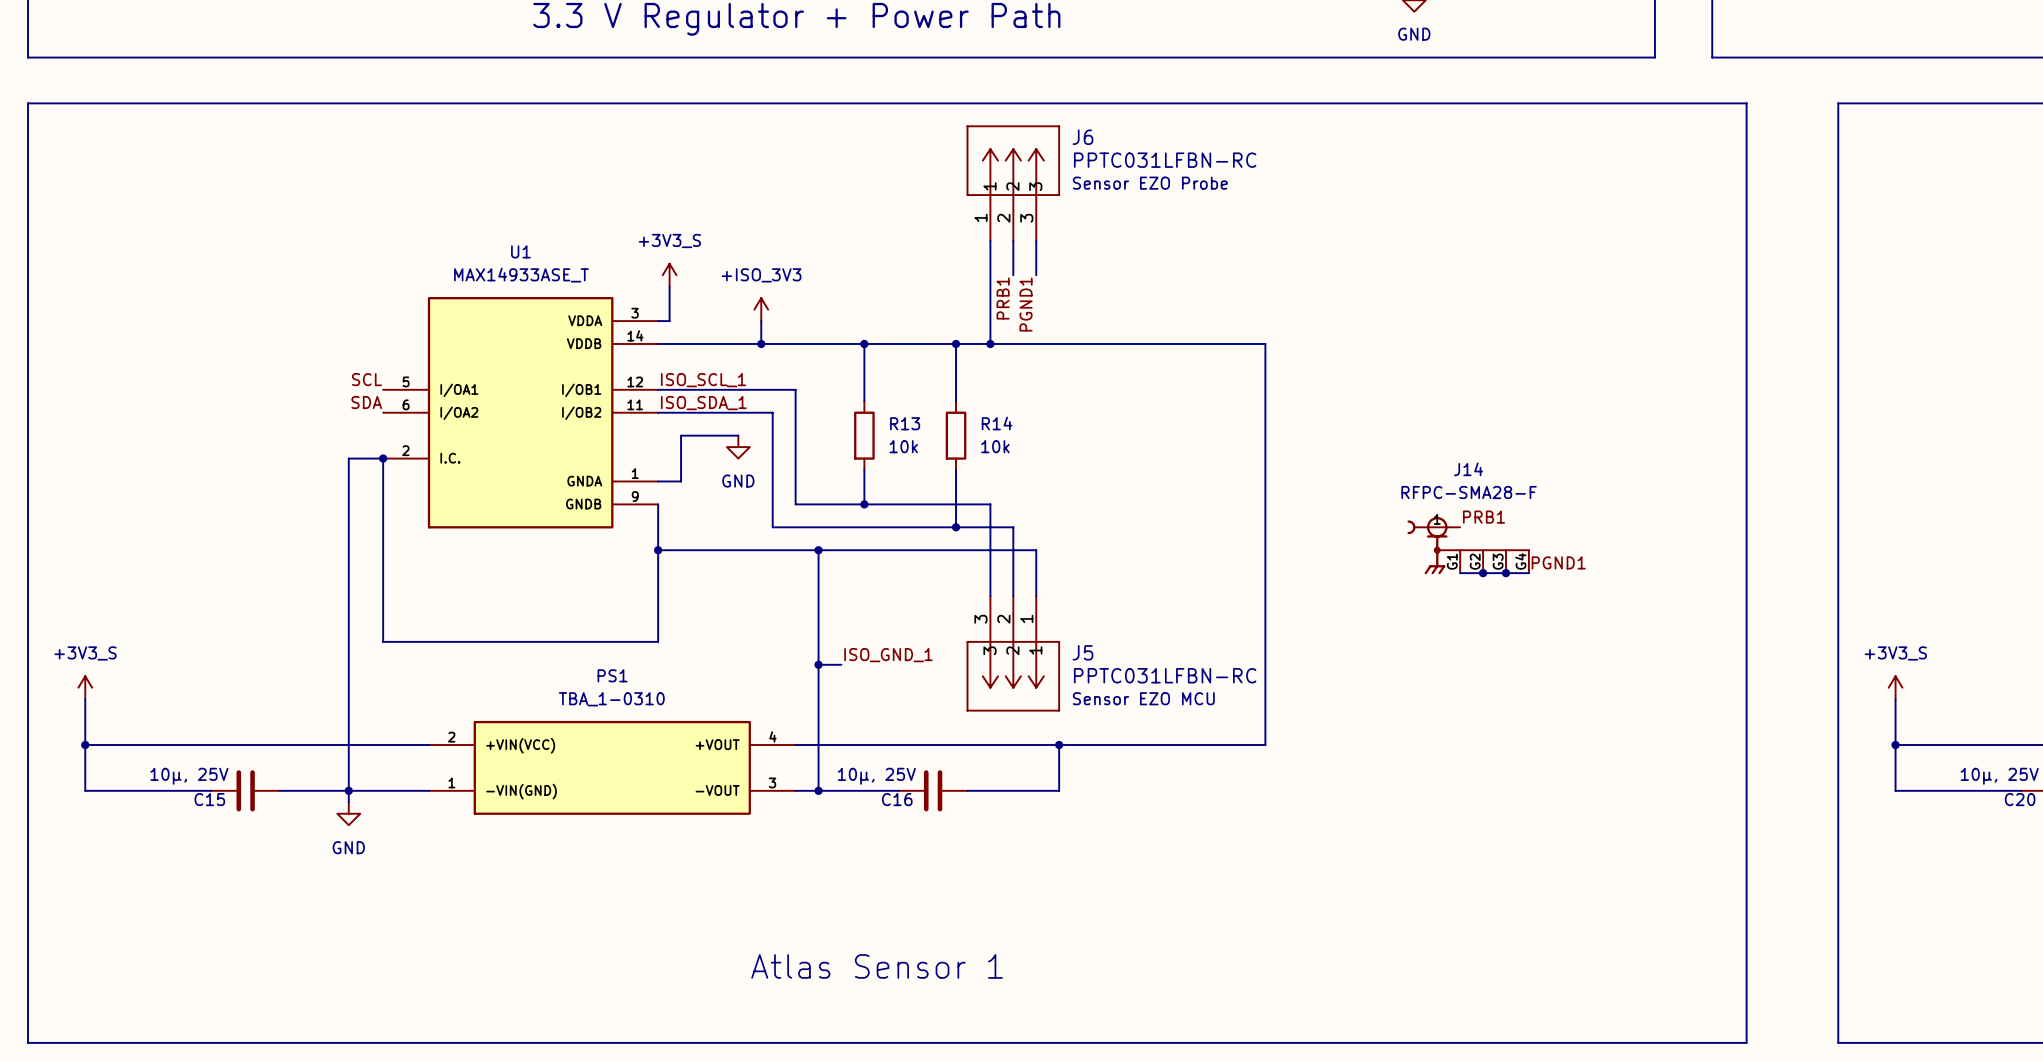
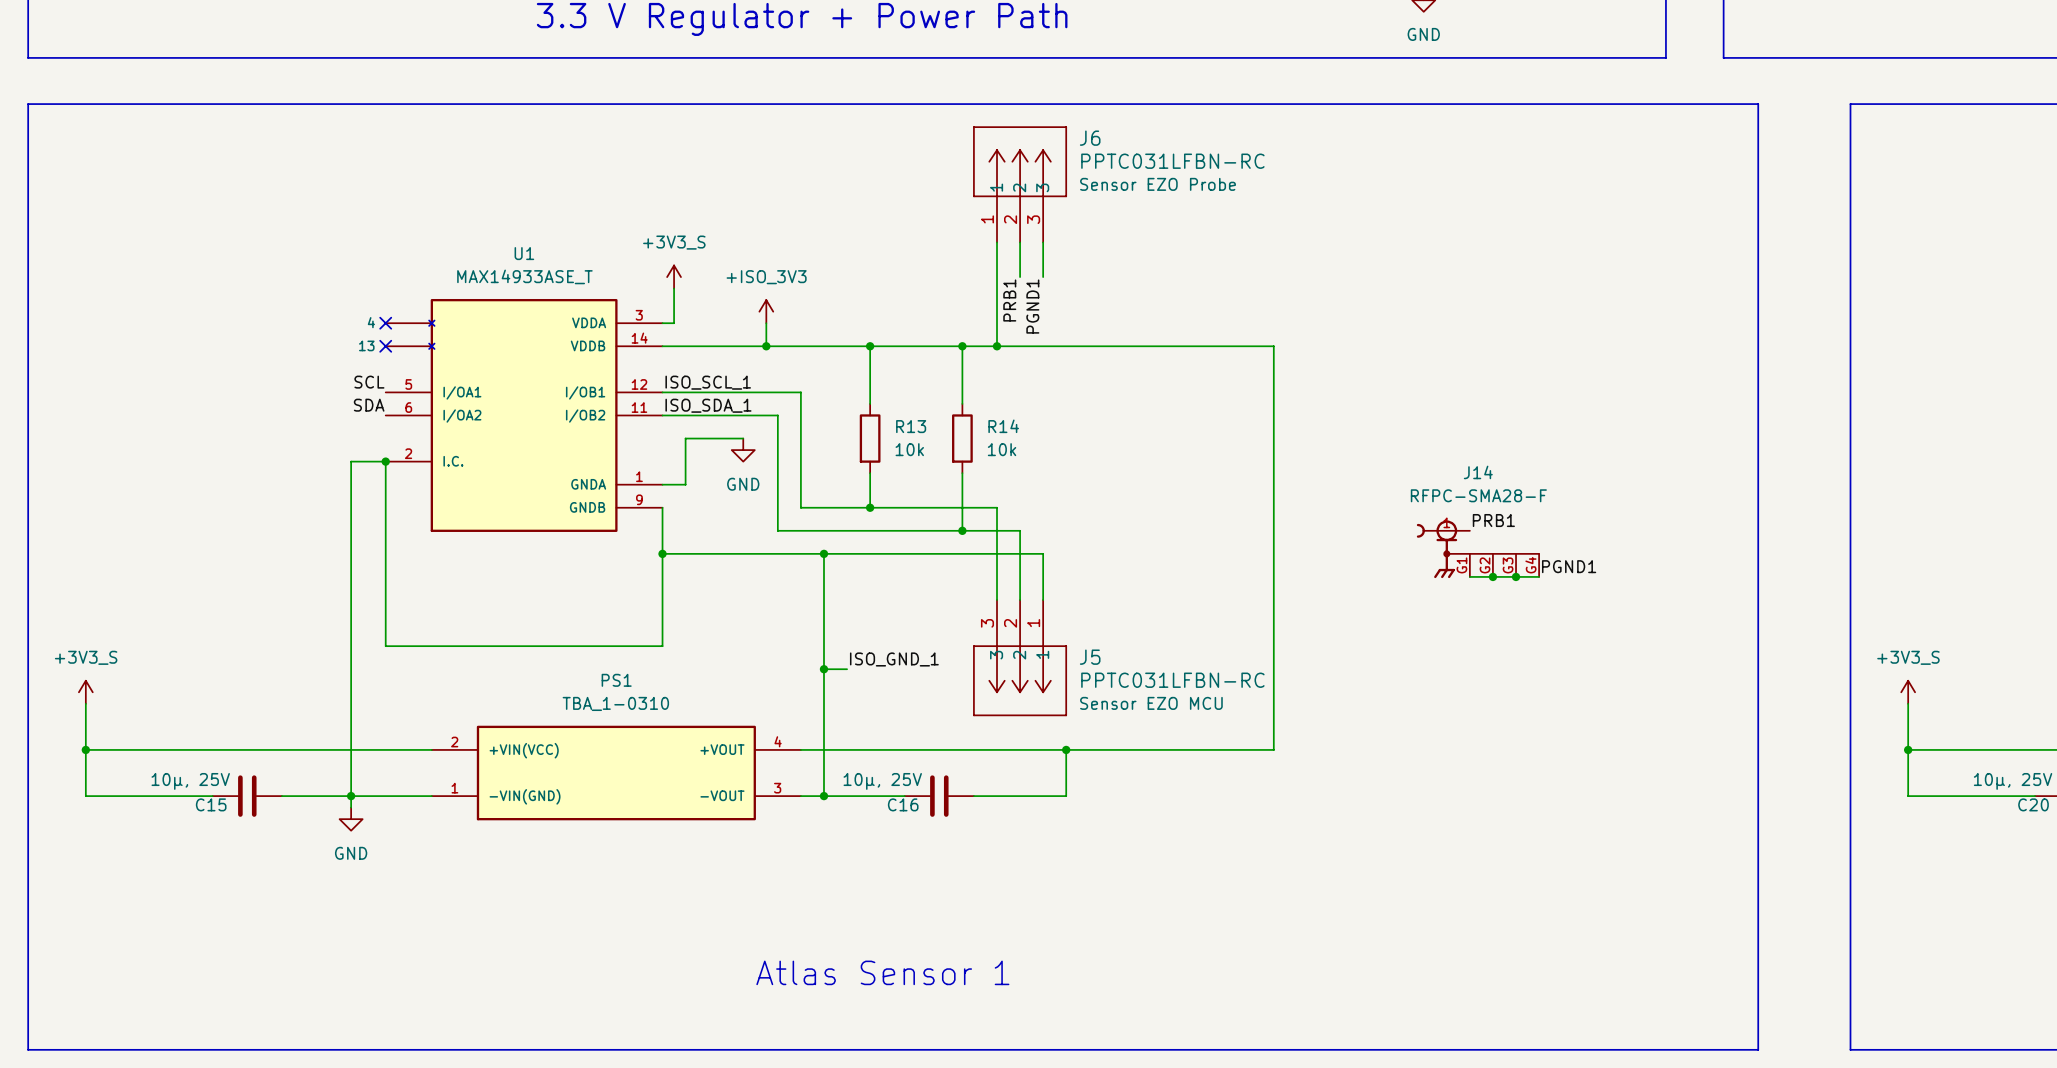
U1 symbol: [383, 297, 659, 529] -> [385, 298, 663, 532]
no-connect mark: none -> (385, 323)
no-connect mark: none -> (385, 346)

